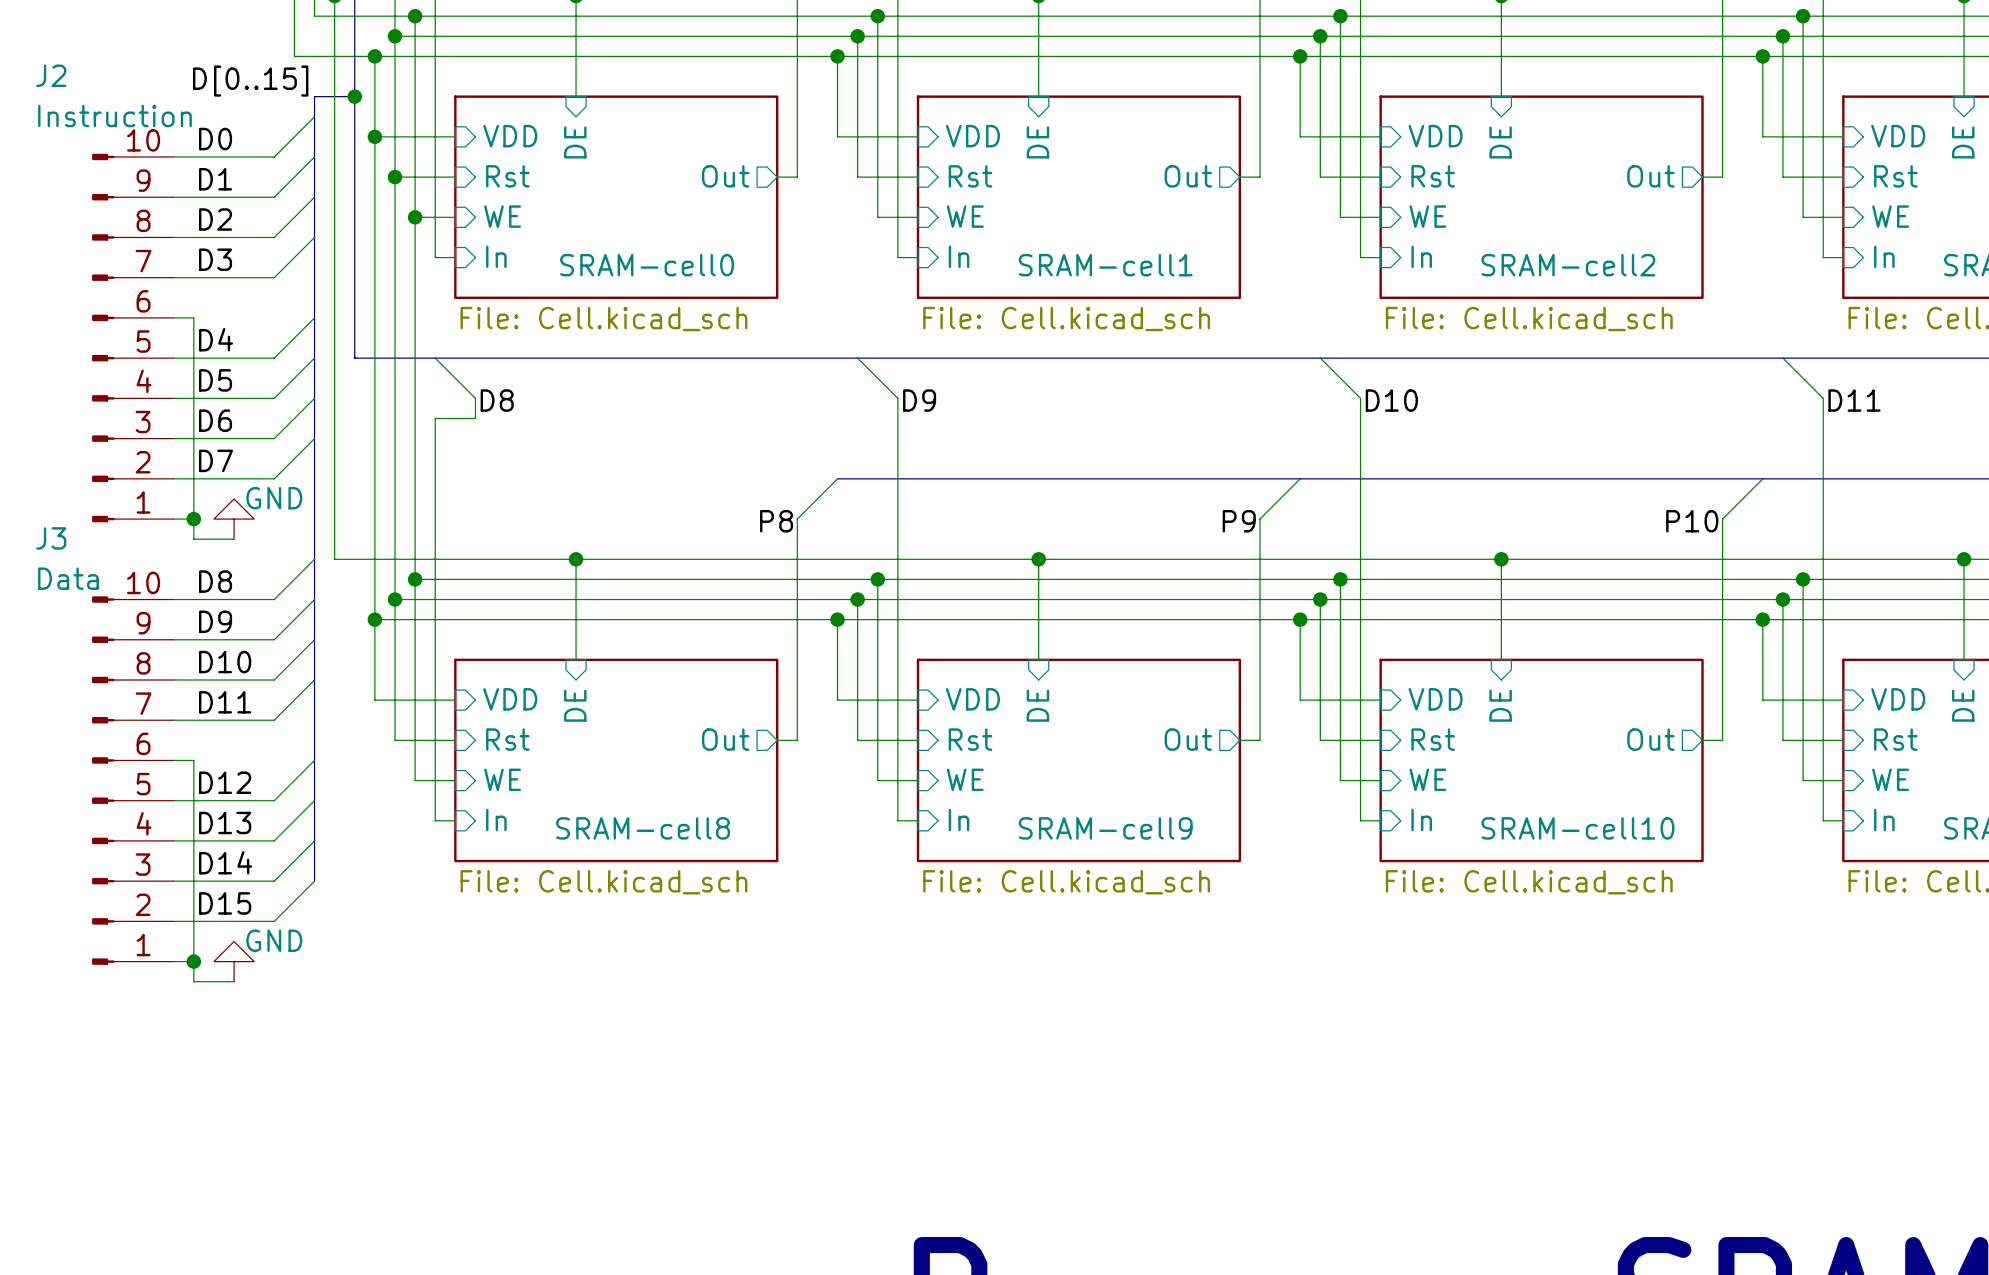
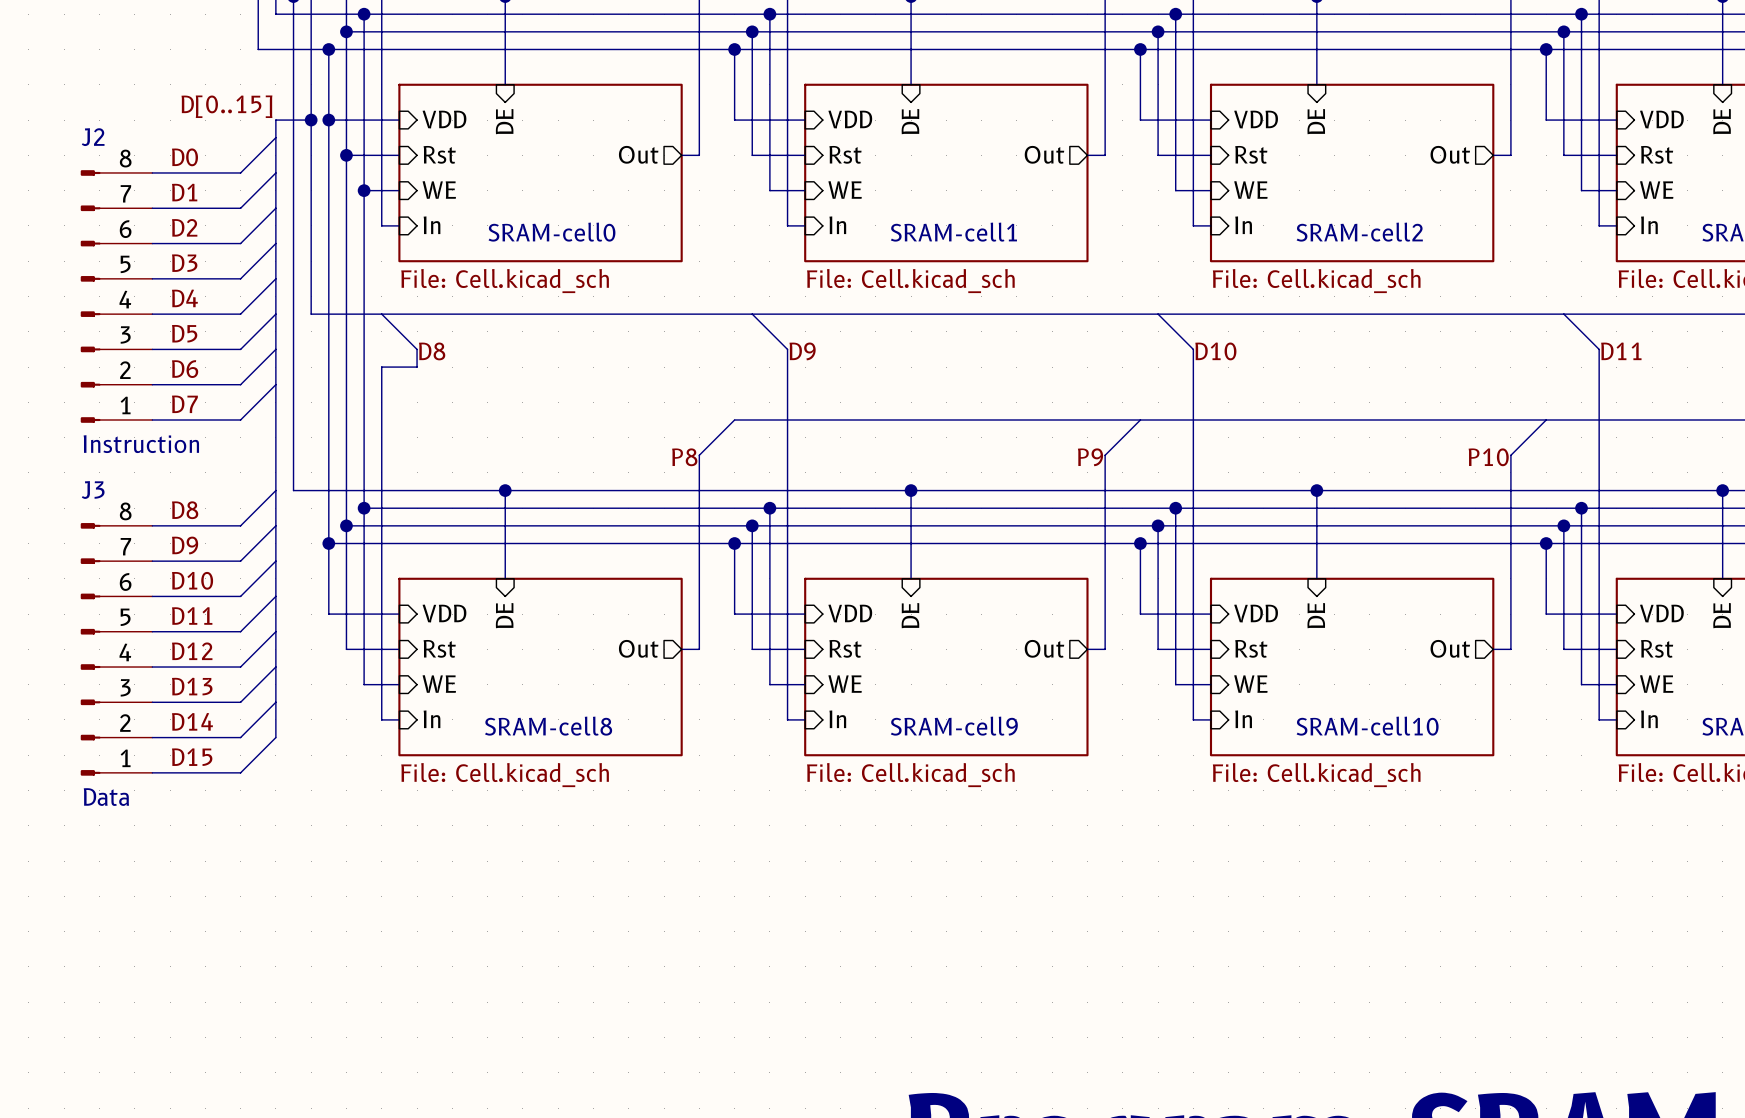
J2 name position: J2 (51, 75) -> J2 (93, 137)
label position: D[0..15] (250, 81) -> D[0..15] (226, 106)
bus: (354, 96) (314, 96) (314, 136) -> (311, 120) (275, 120)
junction position: (354, 96) -> (311, 120)
J2 value position: Instruction (114, 116) -> Instruction (141, 444)
wire: (314, 116) (274, 156) (173, 156) -> none
label: D0 (215, 139) -> none
J2 symbol: [92, 153, 174, 523] -> [80, 170, 153, 423]
label: D1 (215, 179) -> D0 (184, 157)
label: D2 (215, 219) -> D1 (184, 192)
label: D3 (215, 259) -> D2 (184, 227)
label: none -> D3 (184, 263)
wire: (193, 317) (193, 539) (234, 539) -> (170, 278) (240, 278) (275, 243)
wire: (173, 519) (193, 519) -> none
junction: (193, 519) -> none
power symbol: GND (234, 519) -> none
J3 name position: J3 (51, 538) -> J3 (93, 490)
J3 value position: Data (68, 578) -> Data (106, 797)
J3 symbol: [92, 596, 174, 965] -> [80, 523, 153, 776]
label: none -> D12 (192, 651)
wire: (193, 760) (193, 981) (234, 981) -> (170, 667) (240, 667) (275, 631)
label: D12 (225, 782) -> D13 (192, 686)
label: D13 (225, 822) -> D14 (192, 721)
bus: (314, 840) (314, 881) -> none
label: D14 (225, 862) -> D15 (192, 757)
wire: (314, 881) (274, 921) (173, 921) -> none
label: D15 (225, 903) -> none
wire: (173, 961) (193, 961) -> none
junction: (193, 961) -> none
power symbol: GND (234, 961) -> none

